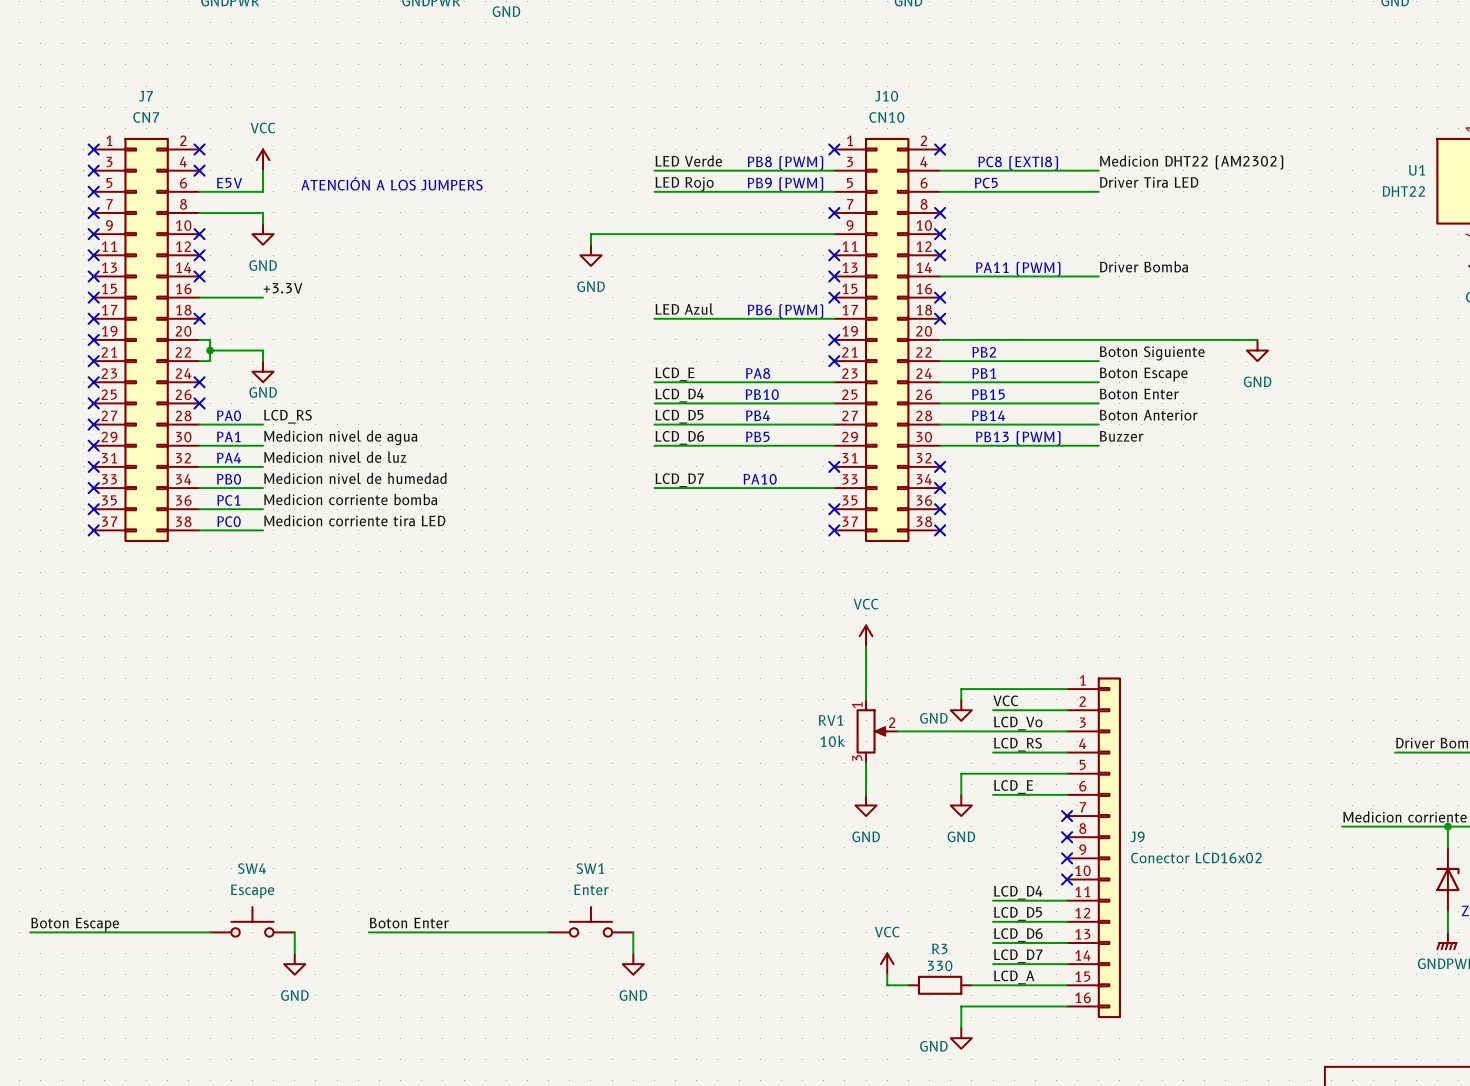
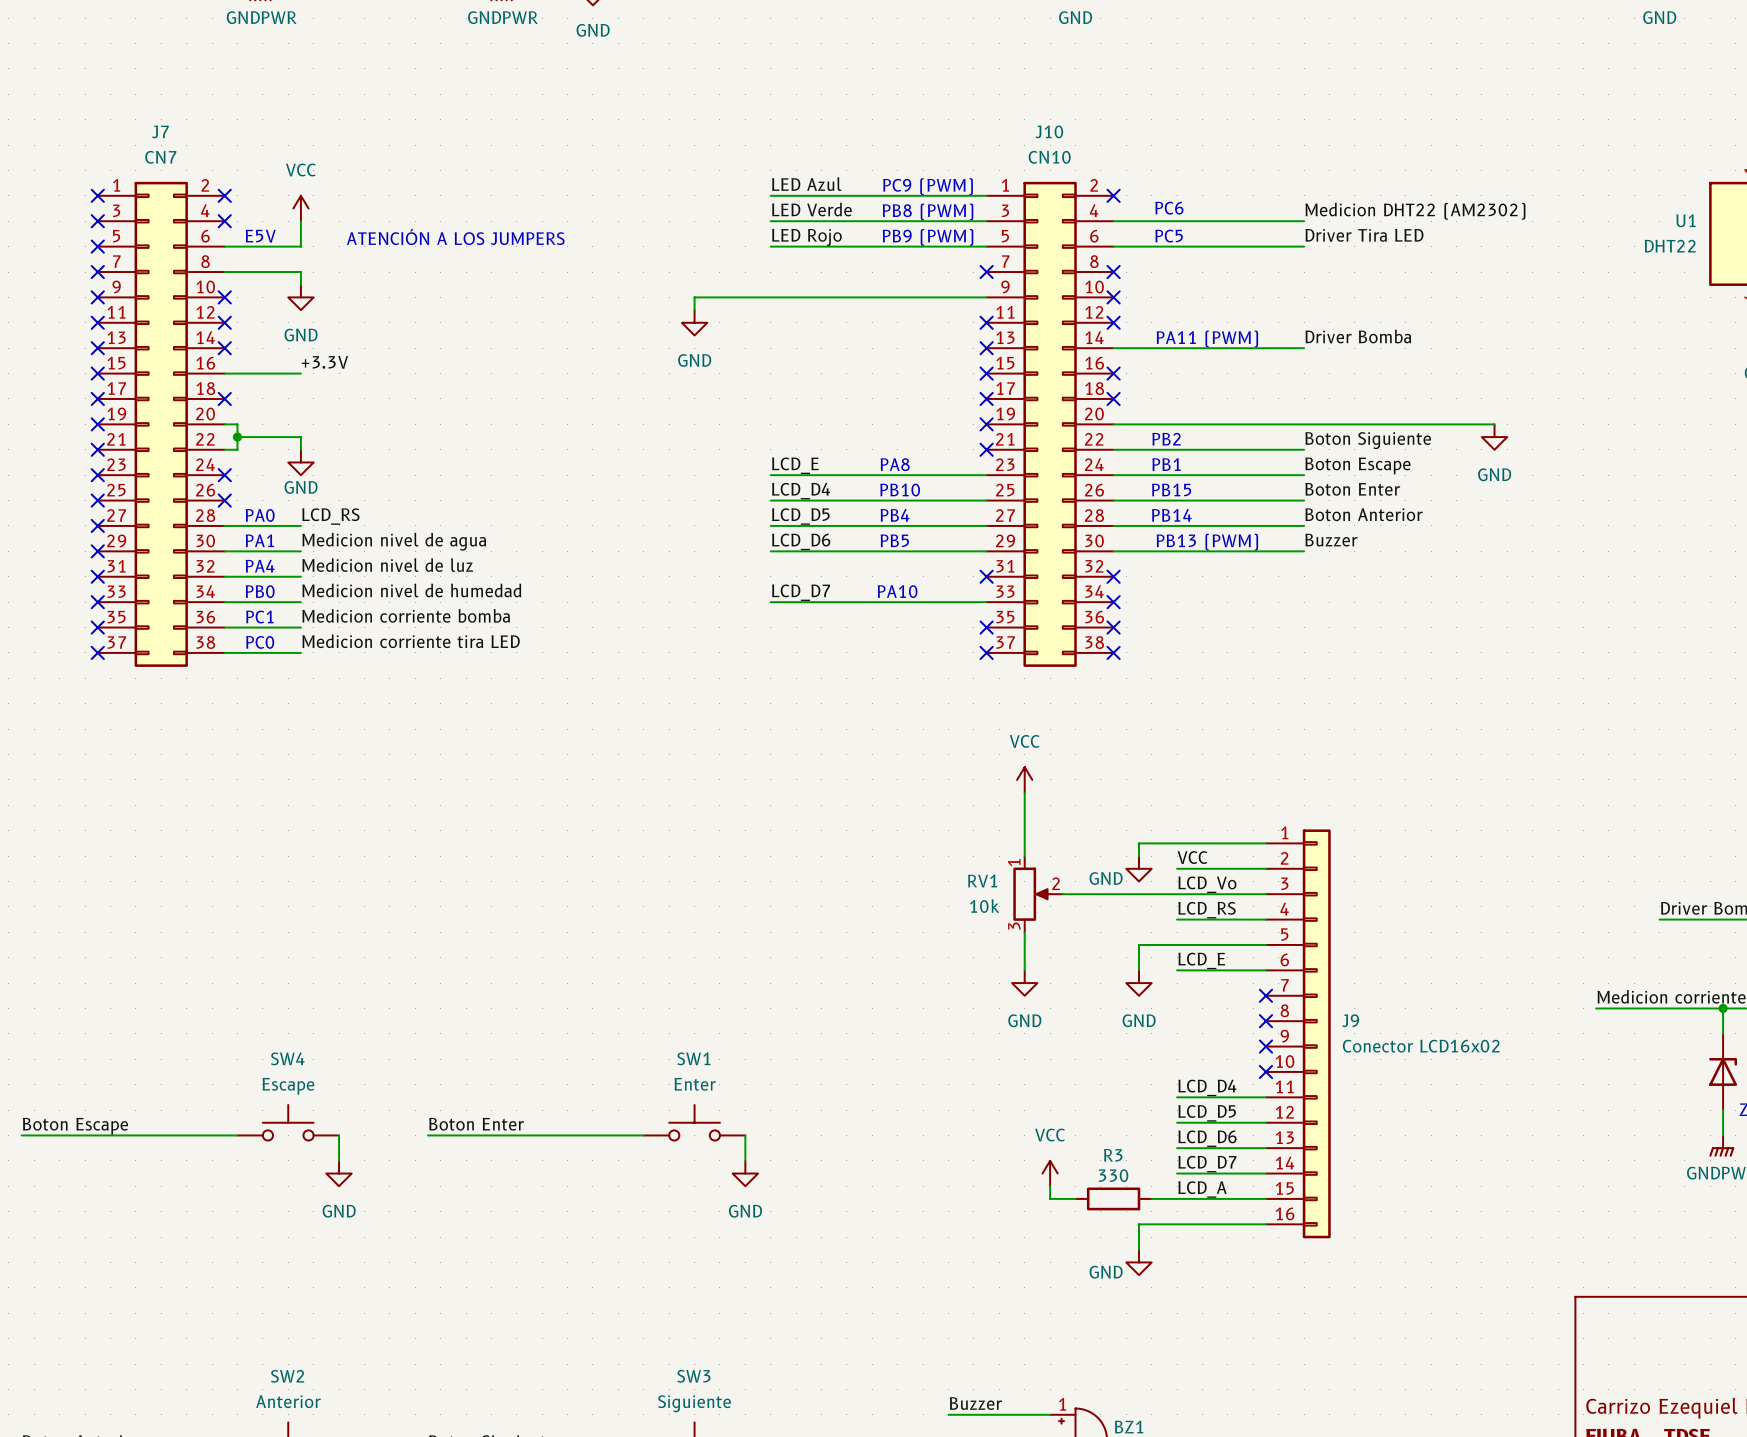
text: none -> PC9 (PWM) (928, 186)
no-connect mark: (834, 149) -> none
text: none -> PC6 (1169, 208)
text: PC8 (EXTI8) (1018, 163) -> none
label position: LED Azul (684, 309) -> LED Azul (806, 184)
text: PB6 (PWM) (785, 311) -> none
wire: (654, 318) (834, 318) -> (770, 195) (986, 195)
no-connect mark: none -> (986, 398)

